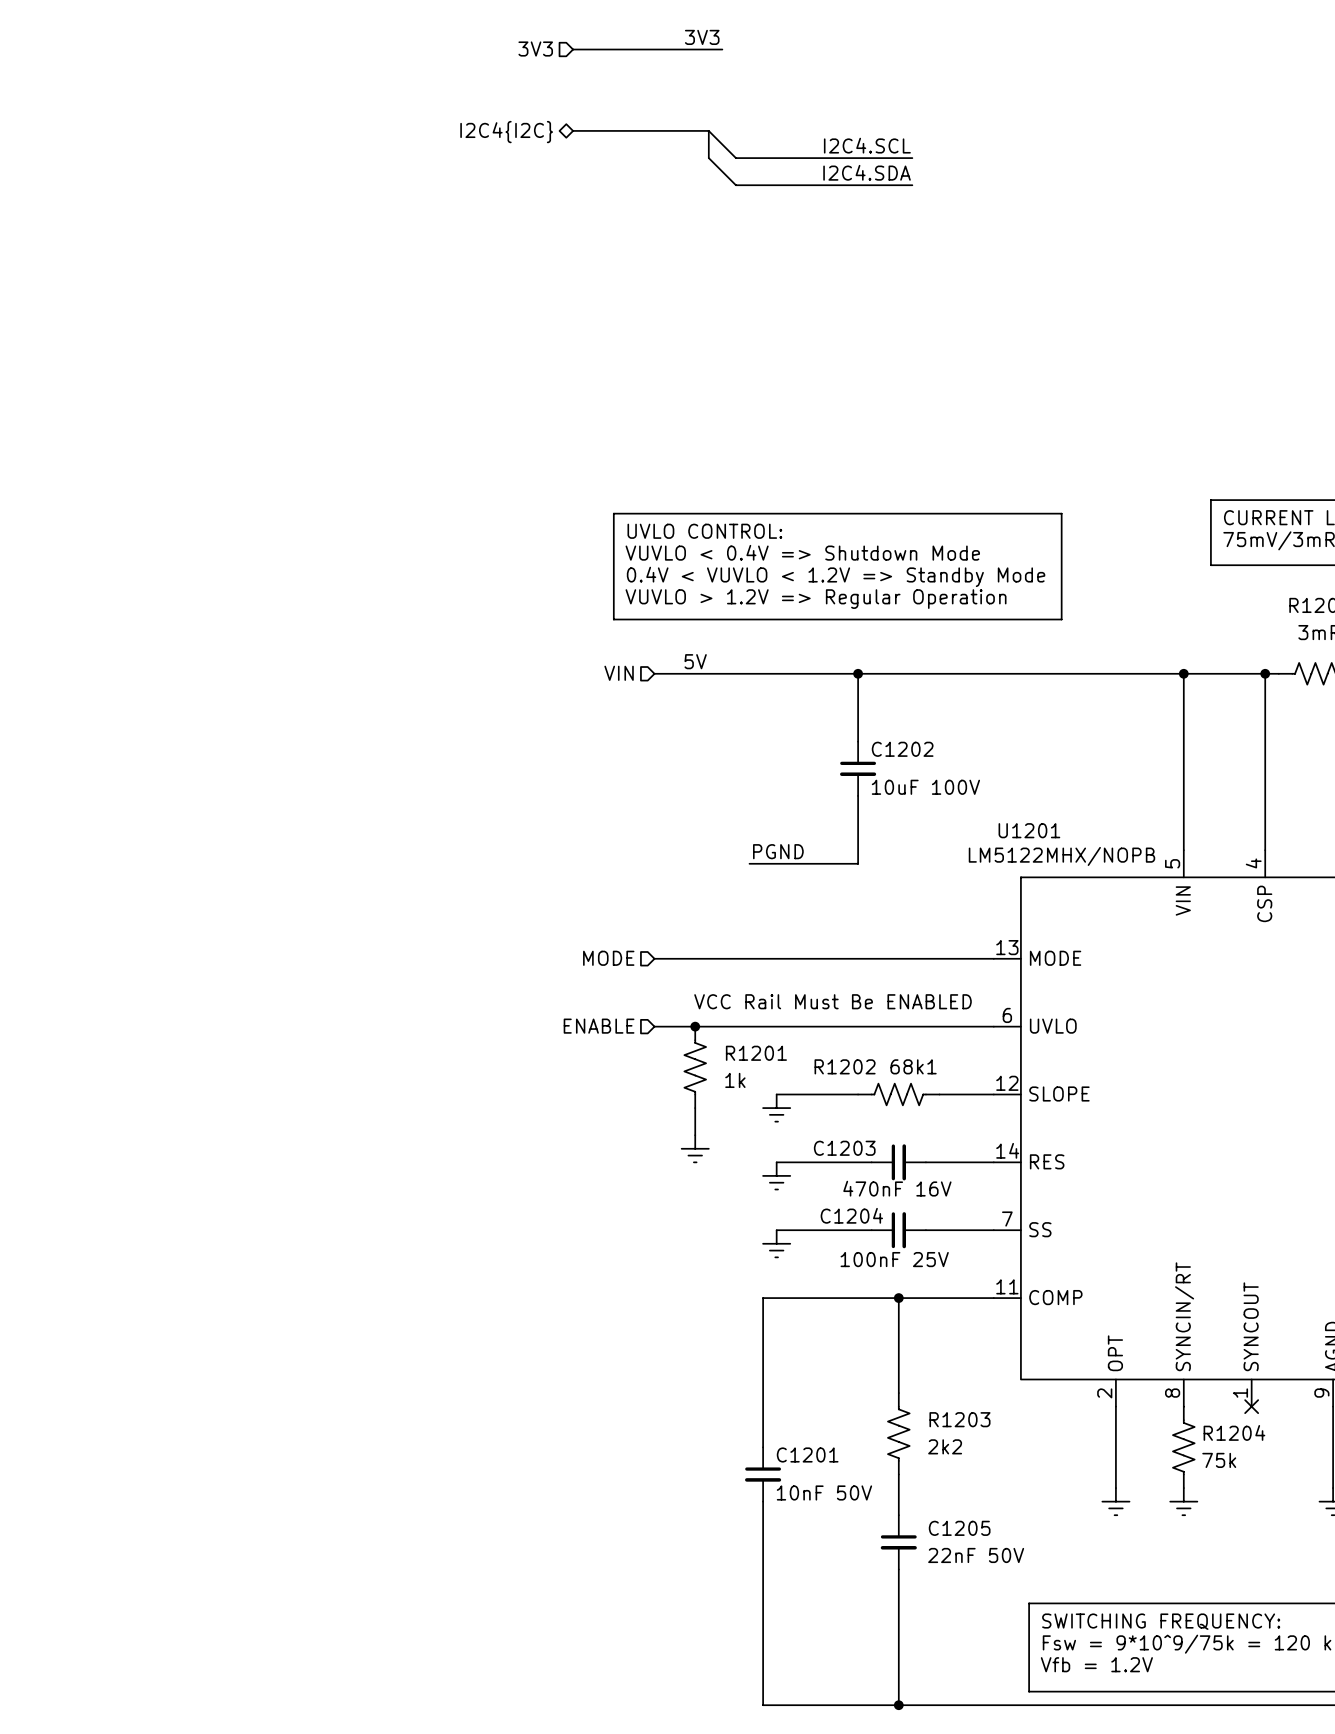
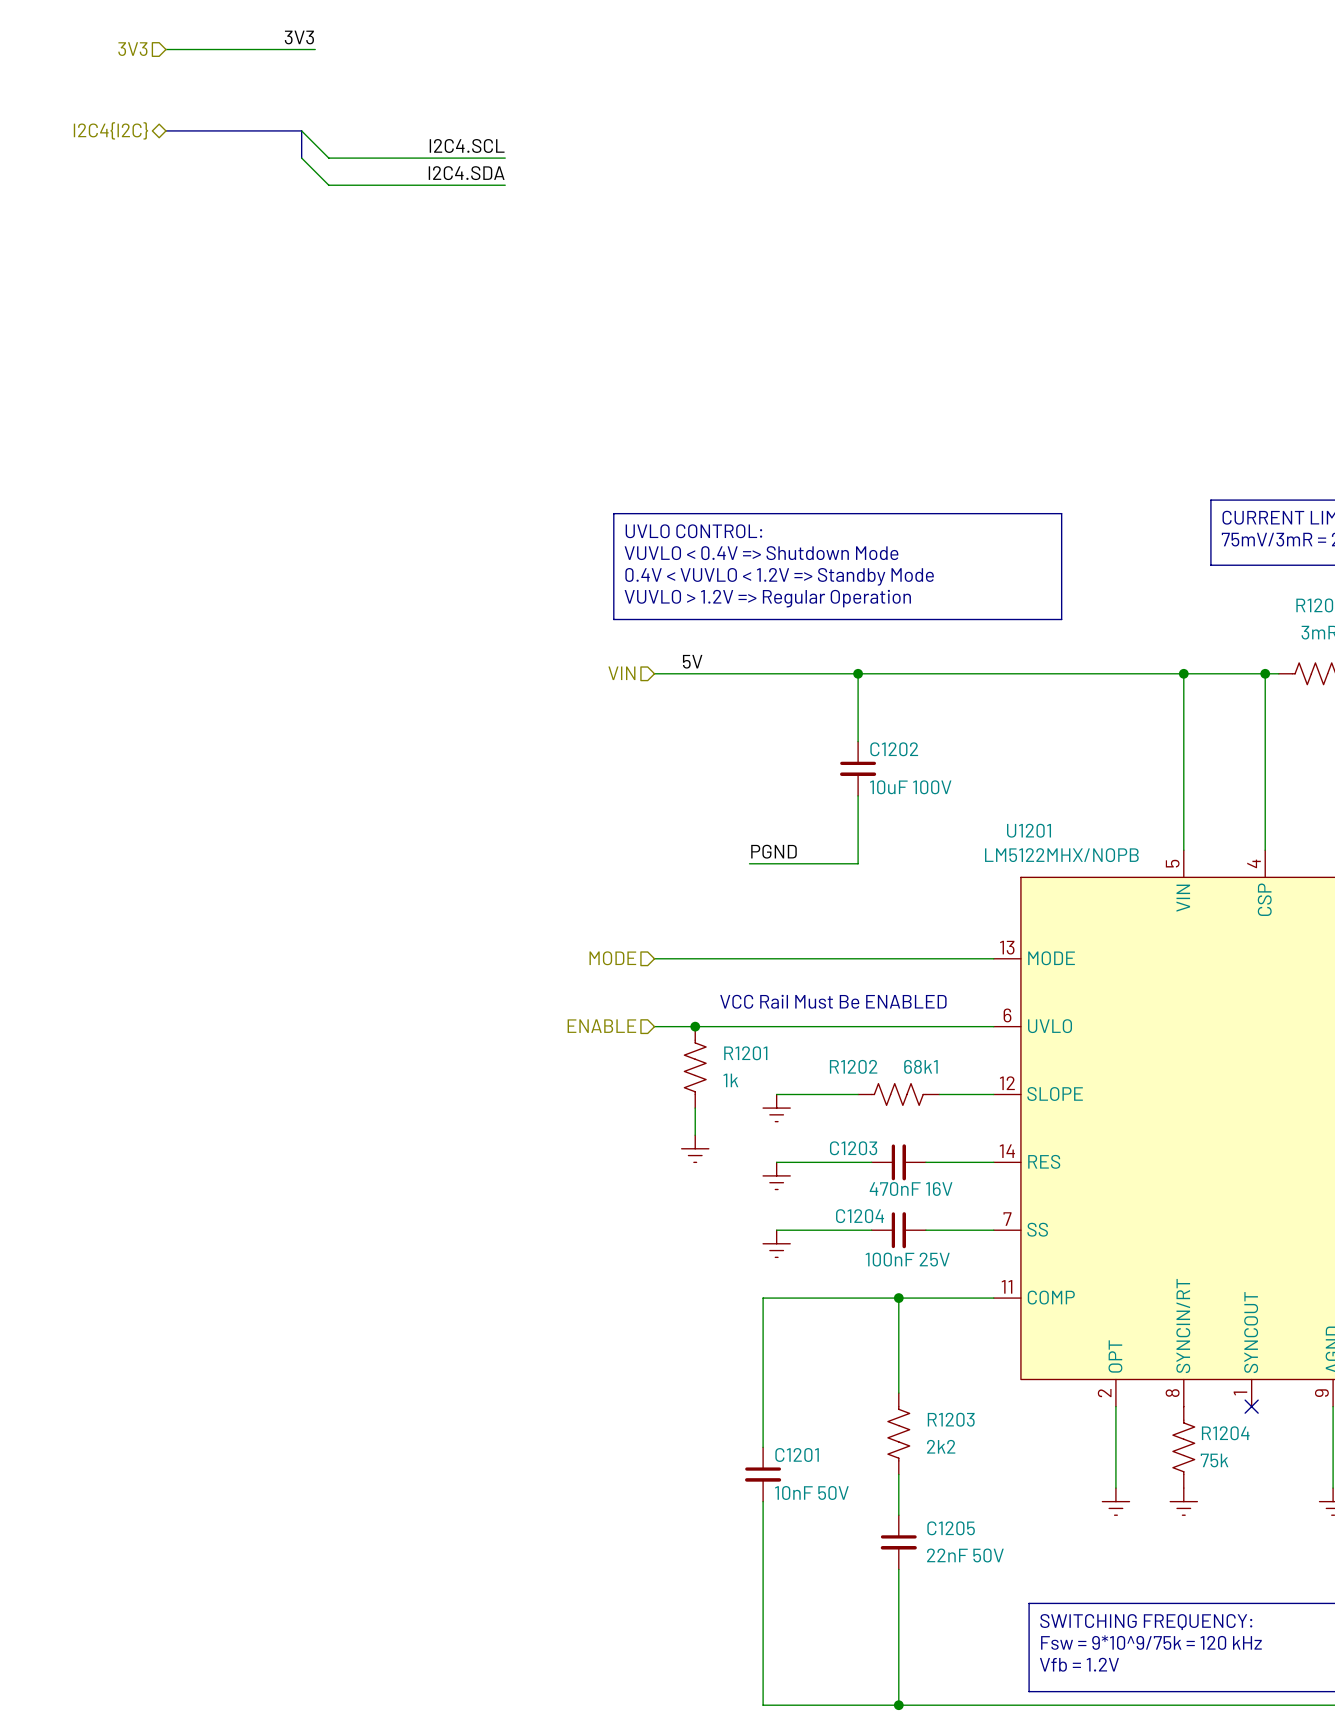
label: none -> 3V3 (299, 37)
label: 3V3 (702, 37) -> none
hierarchical label: none -> 3V3 (132, 49)
wire: none -> (165, 49) (315, 49)
hierarchical label: 3V3 (535, 49) -> none
wire: (573, 49) (722, 49) -> none
bus: none -> (165, 130) (301, 130) (301, 158)
wire: none -> (301, 130) (328, 158) (505, 158)
bus: (573, 130) (708, 130) (708, 158) -> none
wire: (708, 130) (735, 158) (912, 158) -> none
hierarchical label: none -> I2C4{I2C} (110, 130)
hierarchical label: I2C4{I2C} (506, 132) -> none
label: none -> I2C4.SCL (467, 145)
label: I2C4.SCL (867, 145) -> none
wire: none -> (301, 158) (328, 185) (505, 185)
wire: (708, 158) (735, 185) (912, 185) -> none
label: none -> I2C4.SDA (466, 173)
label: I2C4.SDA (867, 172) -> none

